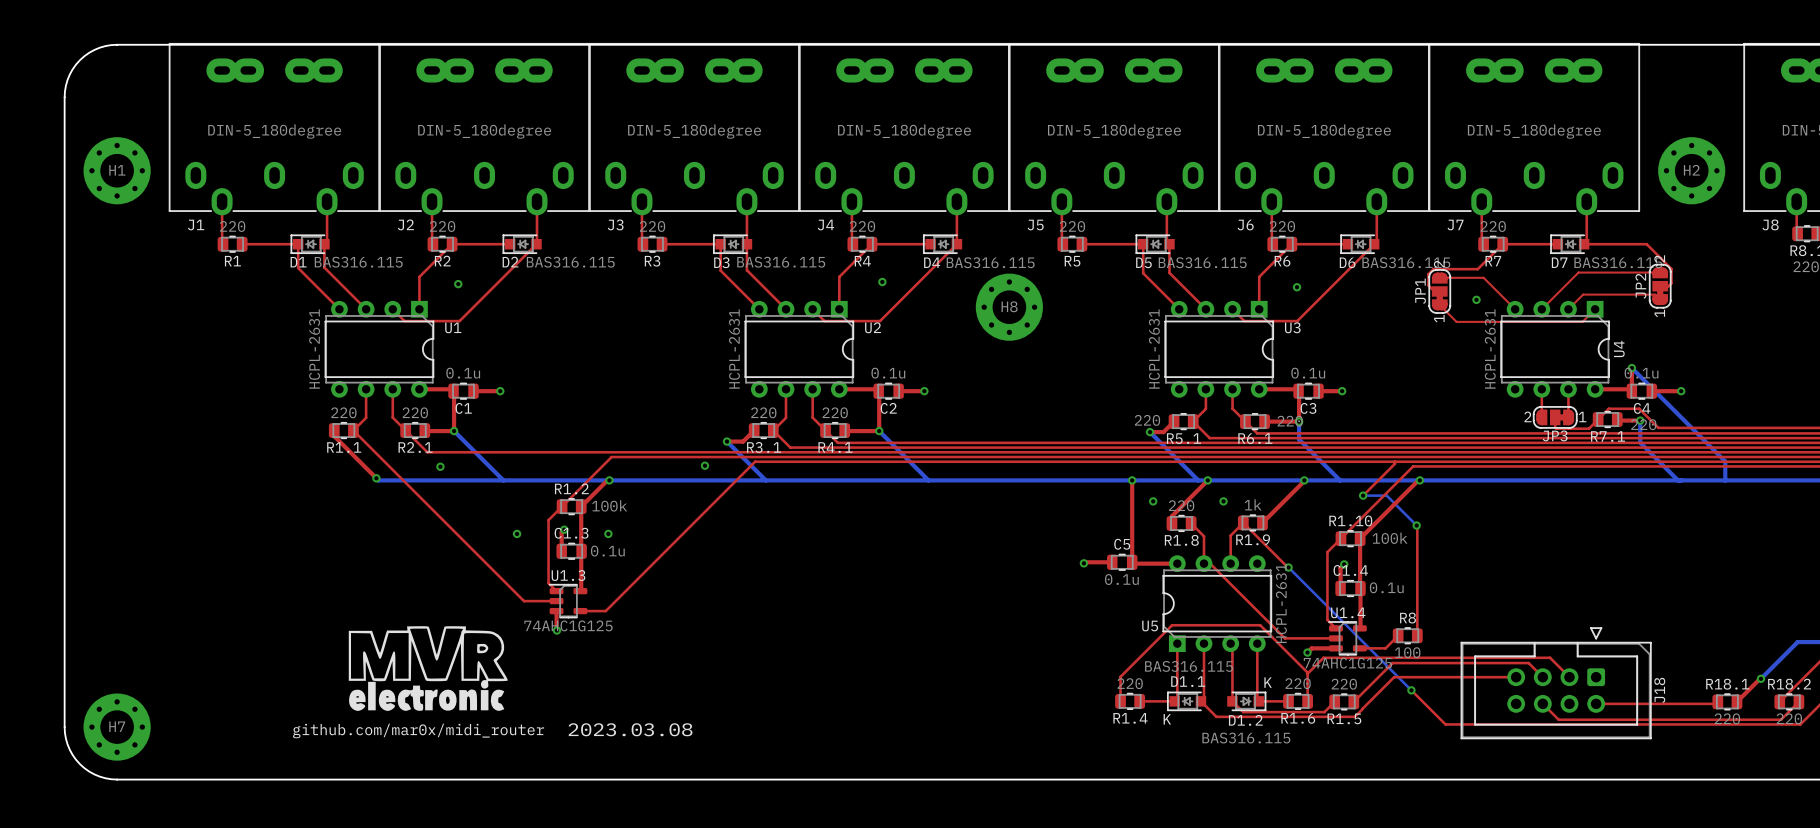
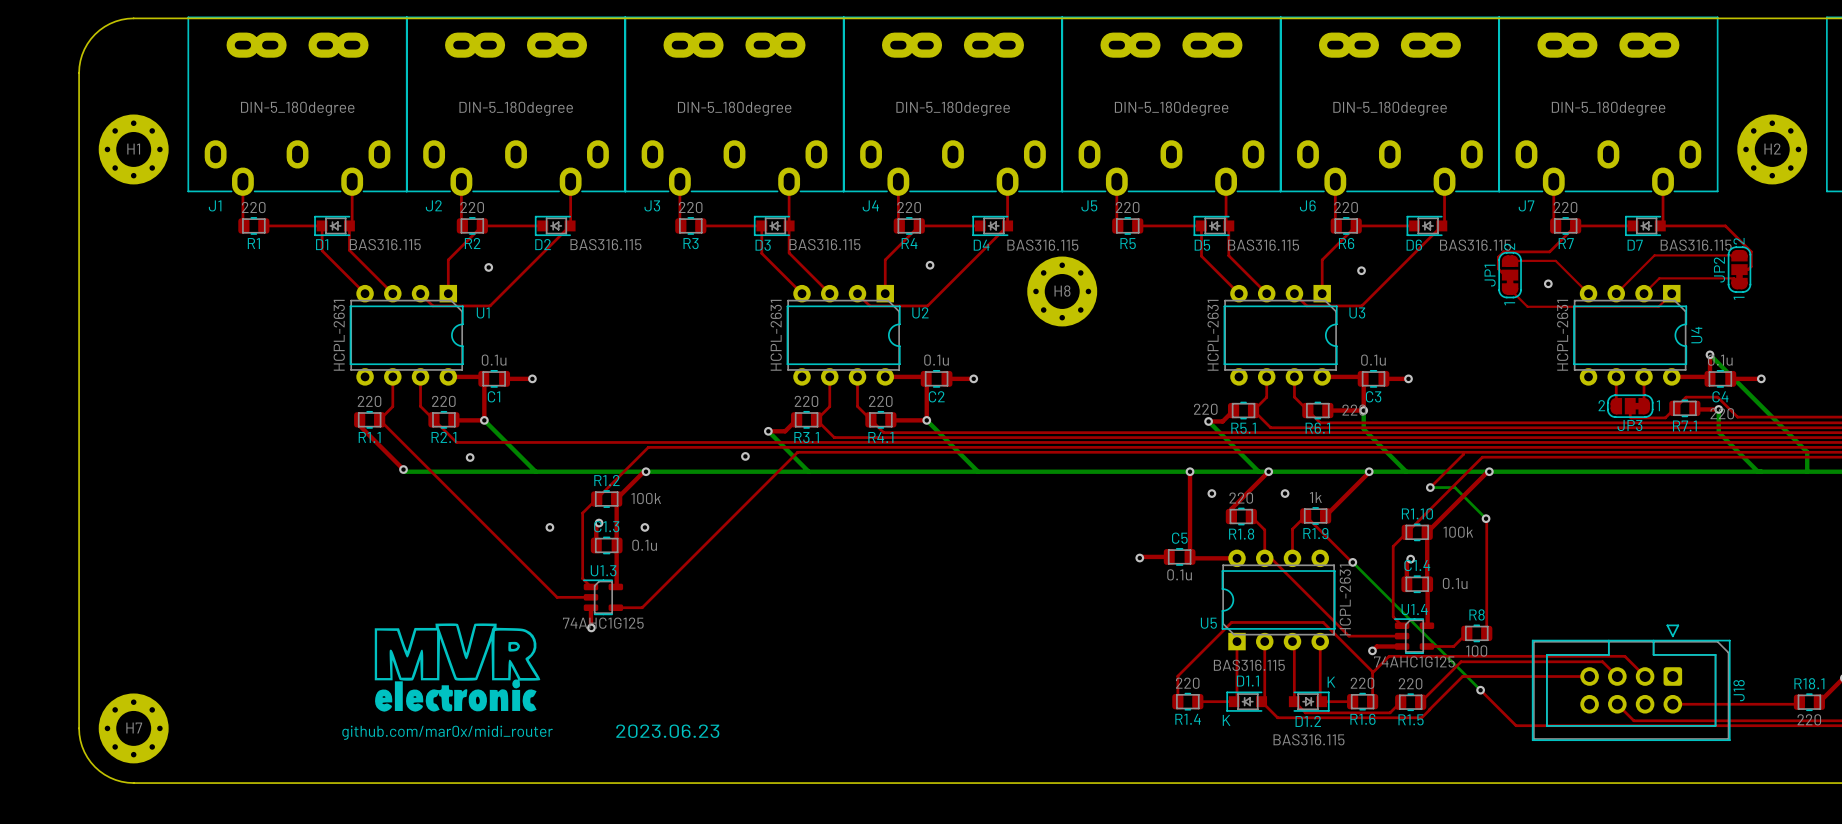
text: 2023.03.08 (630, 729) -> 2023.06.23 (667, 731)

